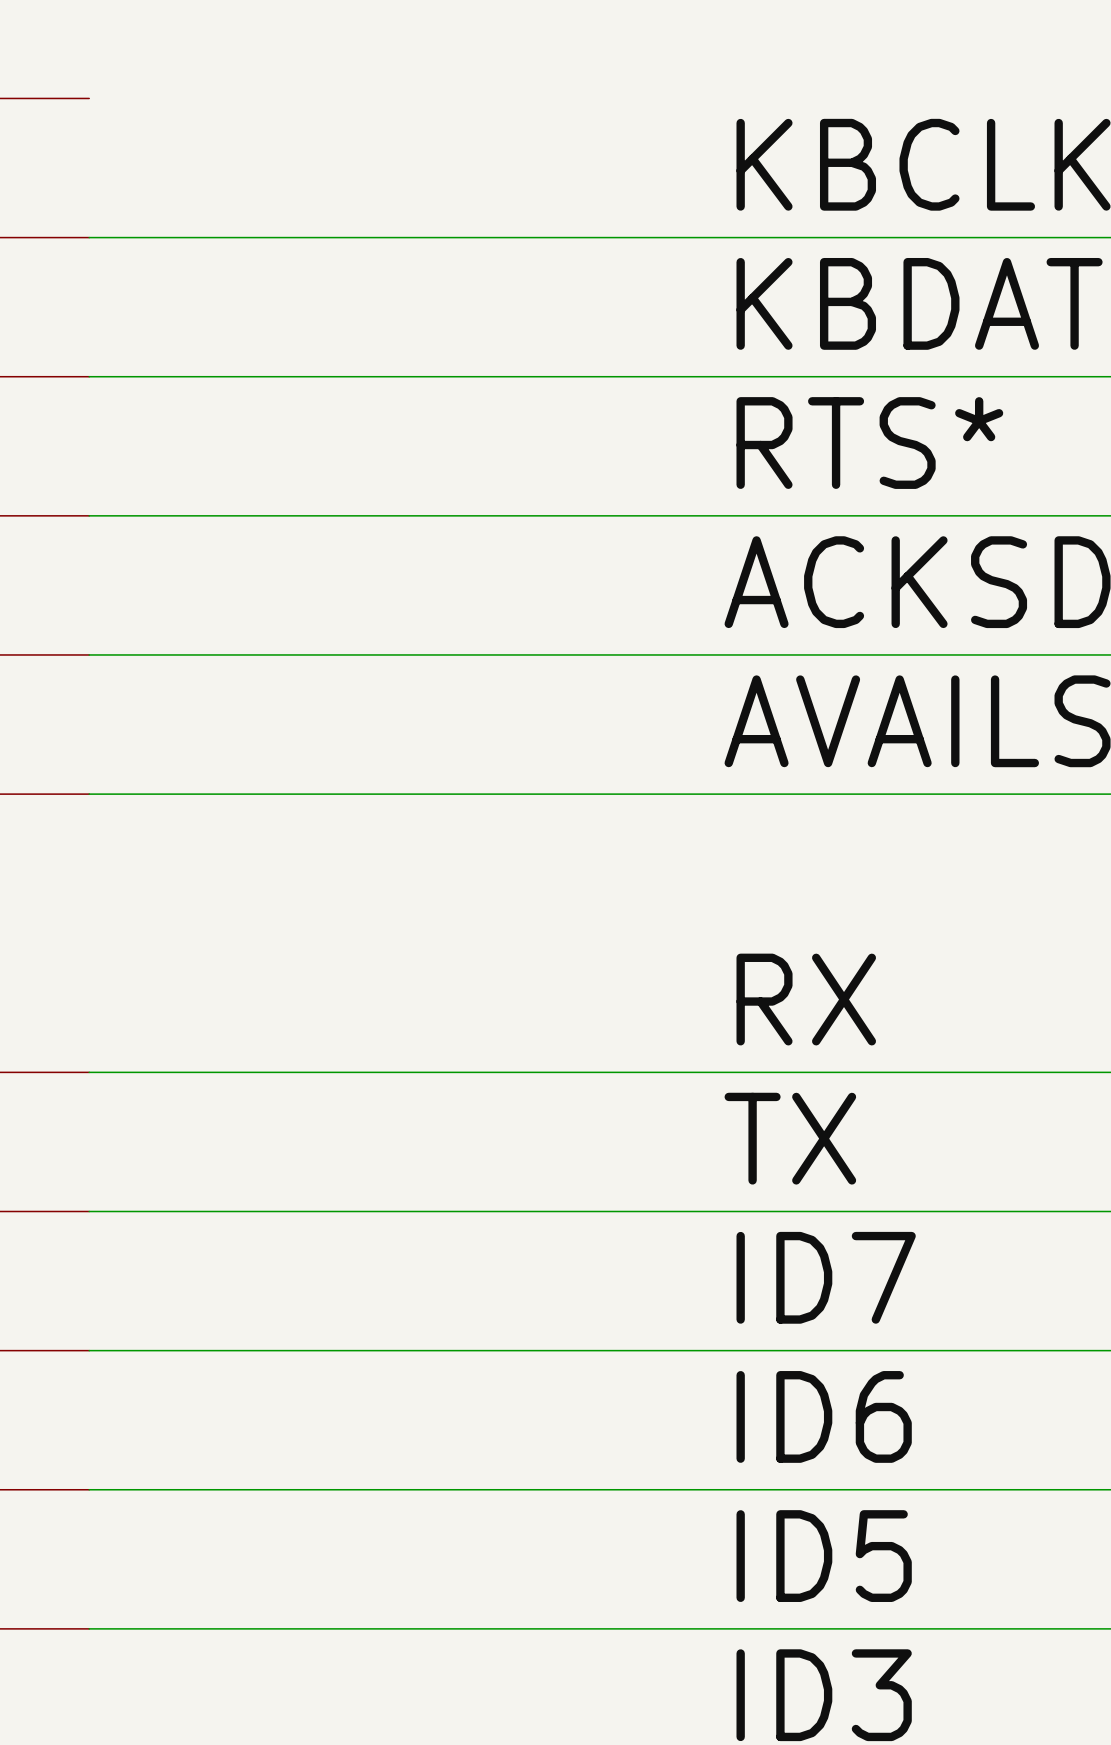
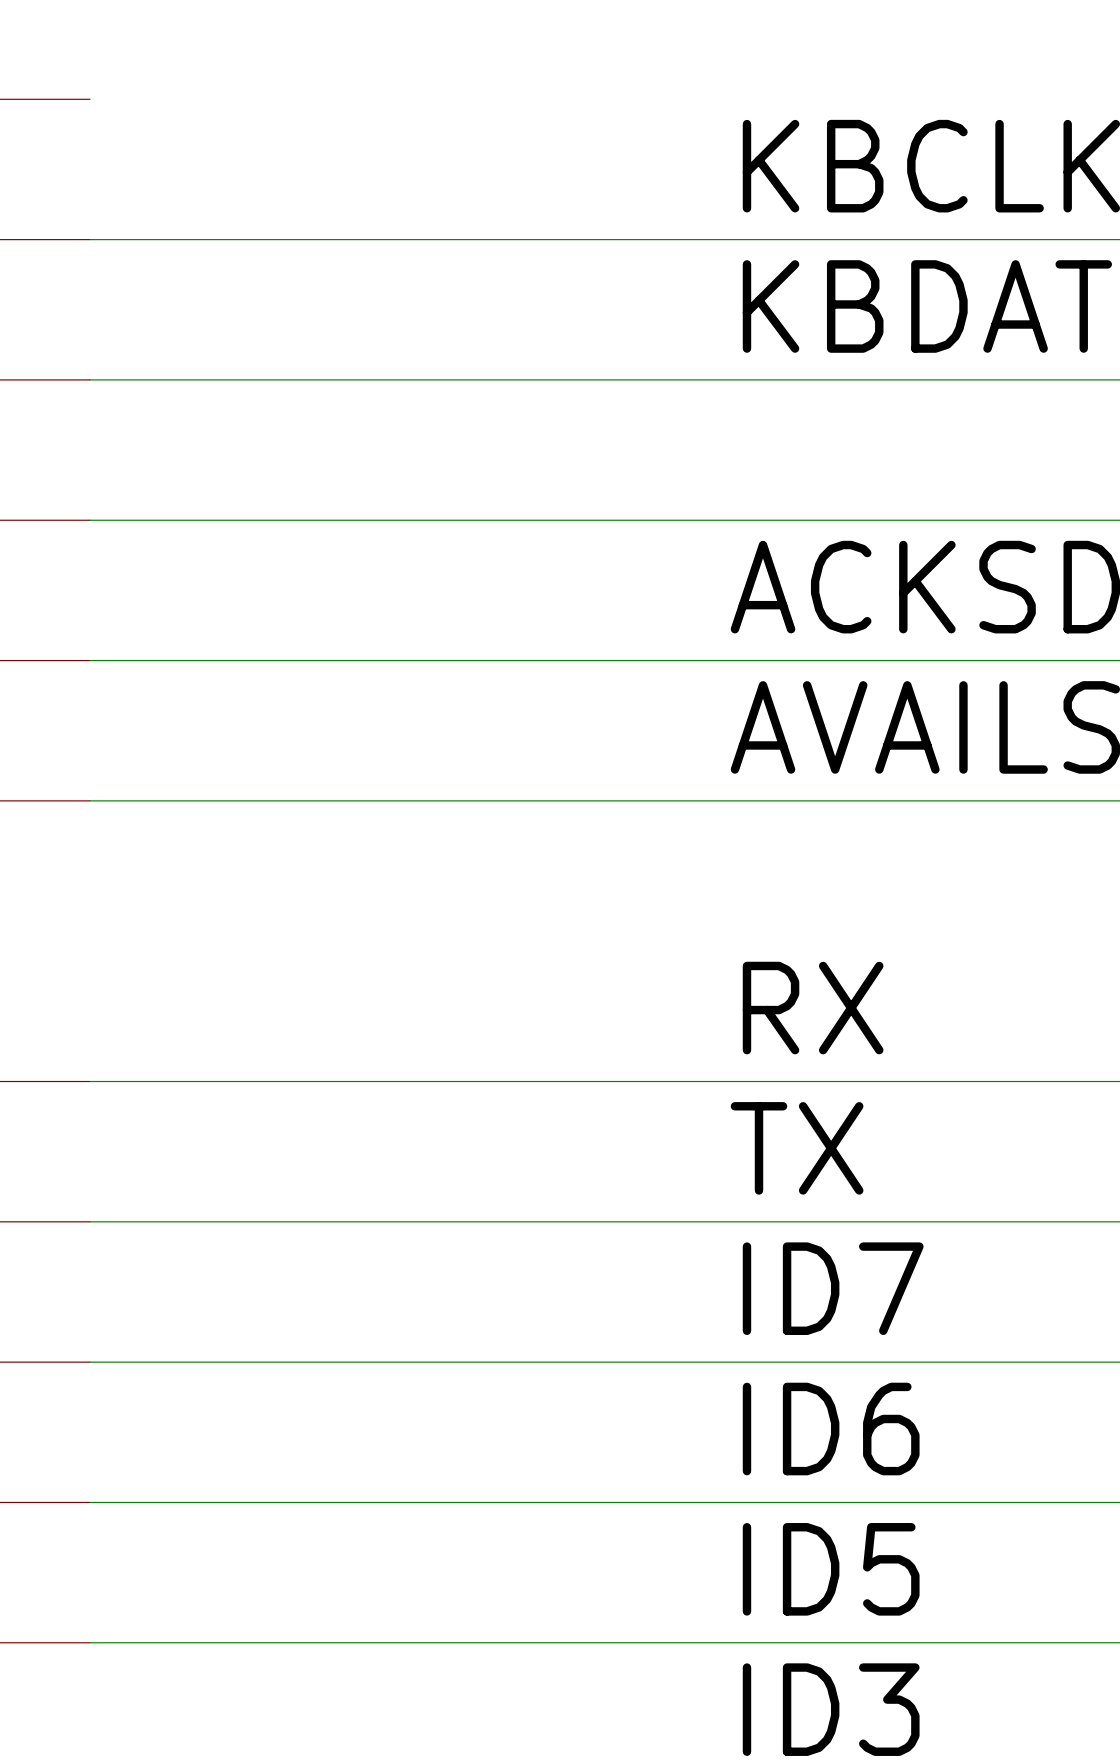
label: RTS* (869, 443) -> none

